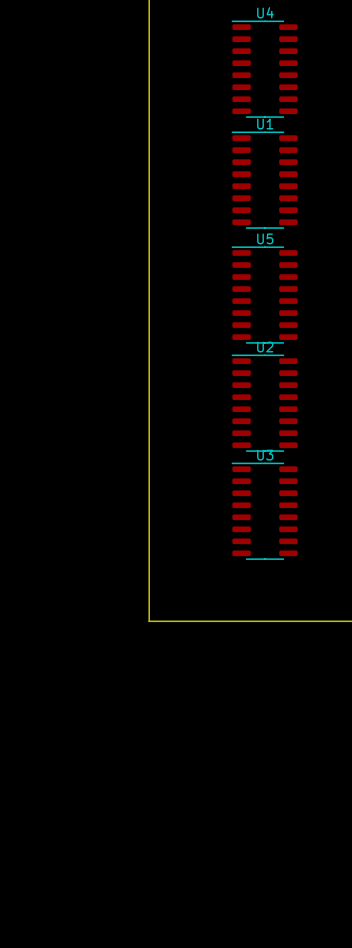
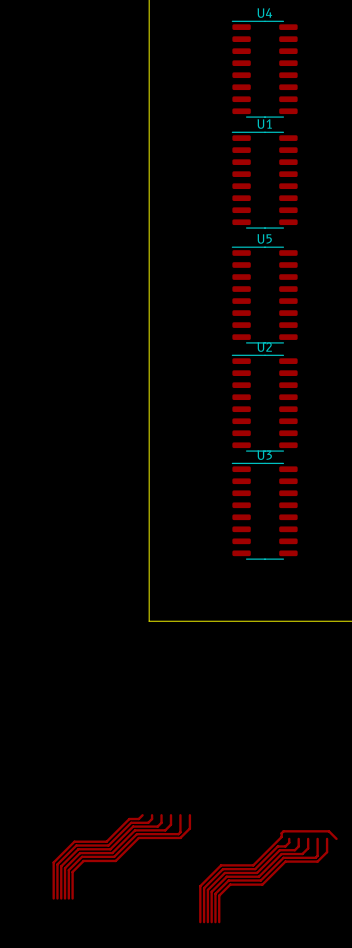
top track: none -> (142, 815) (138, 819) (129, 819) (106, 841) (74, 841) (53, 862) (53, 898)
top track: none -> (152, 815) (152, 819) (148, 822) (131, 822) (108, 845) (76, 845) (57, 864) (57, 898)
top track: none -> (161, 815) (161, 822) (157, 826) (133, 826) (110, 849) (78, 849) (61, 866) (61, 898)
top track: none -> (170, 815) (170, 824) (165, 830) (135, 830) (112, 853) (80, 853) (65, 868) (65, 898)
top track: none -> (180, 815) (180, 832) (178, 834) (136, 834) (114, 856) (82, 856) (68, 870) (68, 898)
top track: none -> (189, 815) (189, 828) (180, 837) (138, 837) (115, 860) (83, 860) (72, 872) (72, 898)
top track: none -> (289, 838) (289, 842) (285, 846) (277, 846) (255, 869) (223, 869) (204, 888) (204, 922)
top track: none -> (298, 838) (298, 846) (294, 850) (279, 850) (257, 872) (224, 872) (207, 889) (207, 922)
top track: none -> (308, 838) (308, 848) (302, 854) (281, 854) (258, 876) (226, 876) (211, 891) (211, 922)
top track: none -> (317, 838) (317, 855) (315, 857) (283, 857) (260, 880) (228, 880) (215, 893) (215, 922)
top track: none -> (327, 838) (327, 852) (317, 861) (285, 861) (262, 884) (230, 884) (219, 895) (219, 922)
top track: none -> (336, 838) (328, 831) (283, 831) (281, 837) (253, 865) (221, 865) (200, 886) (200, 922)

